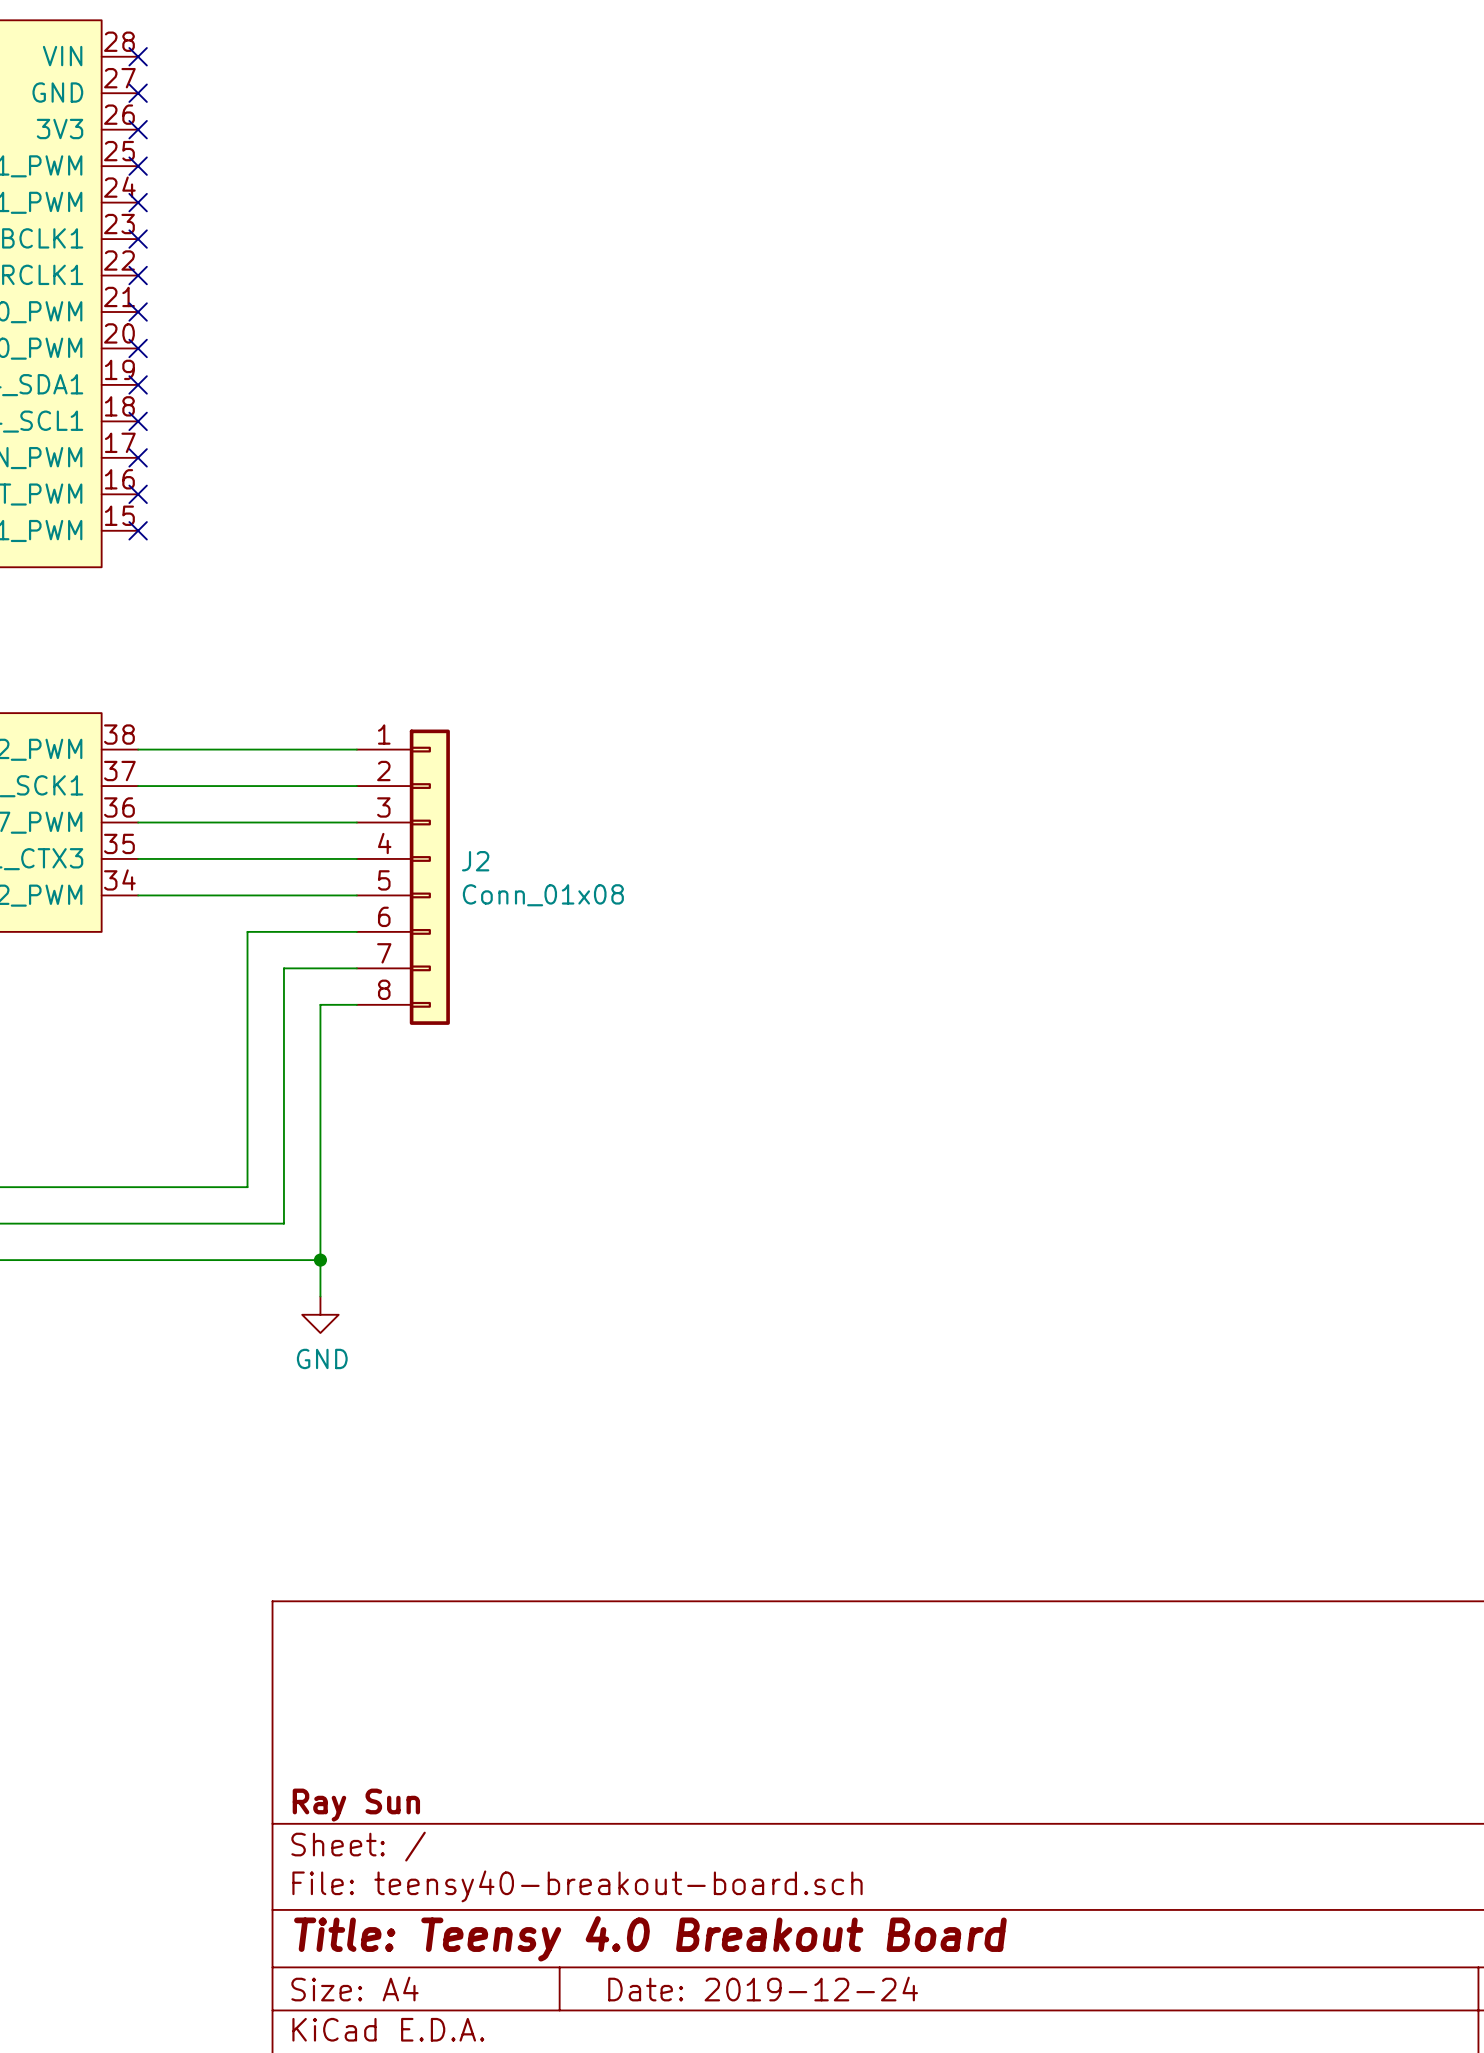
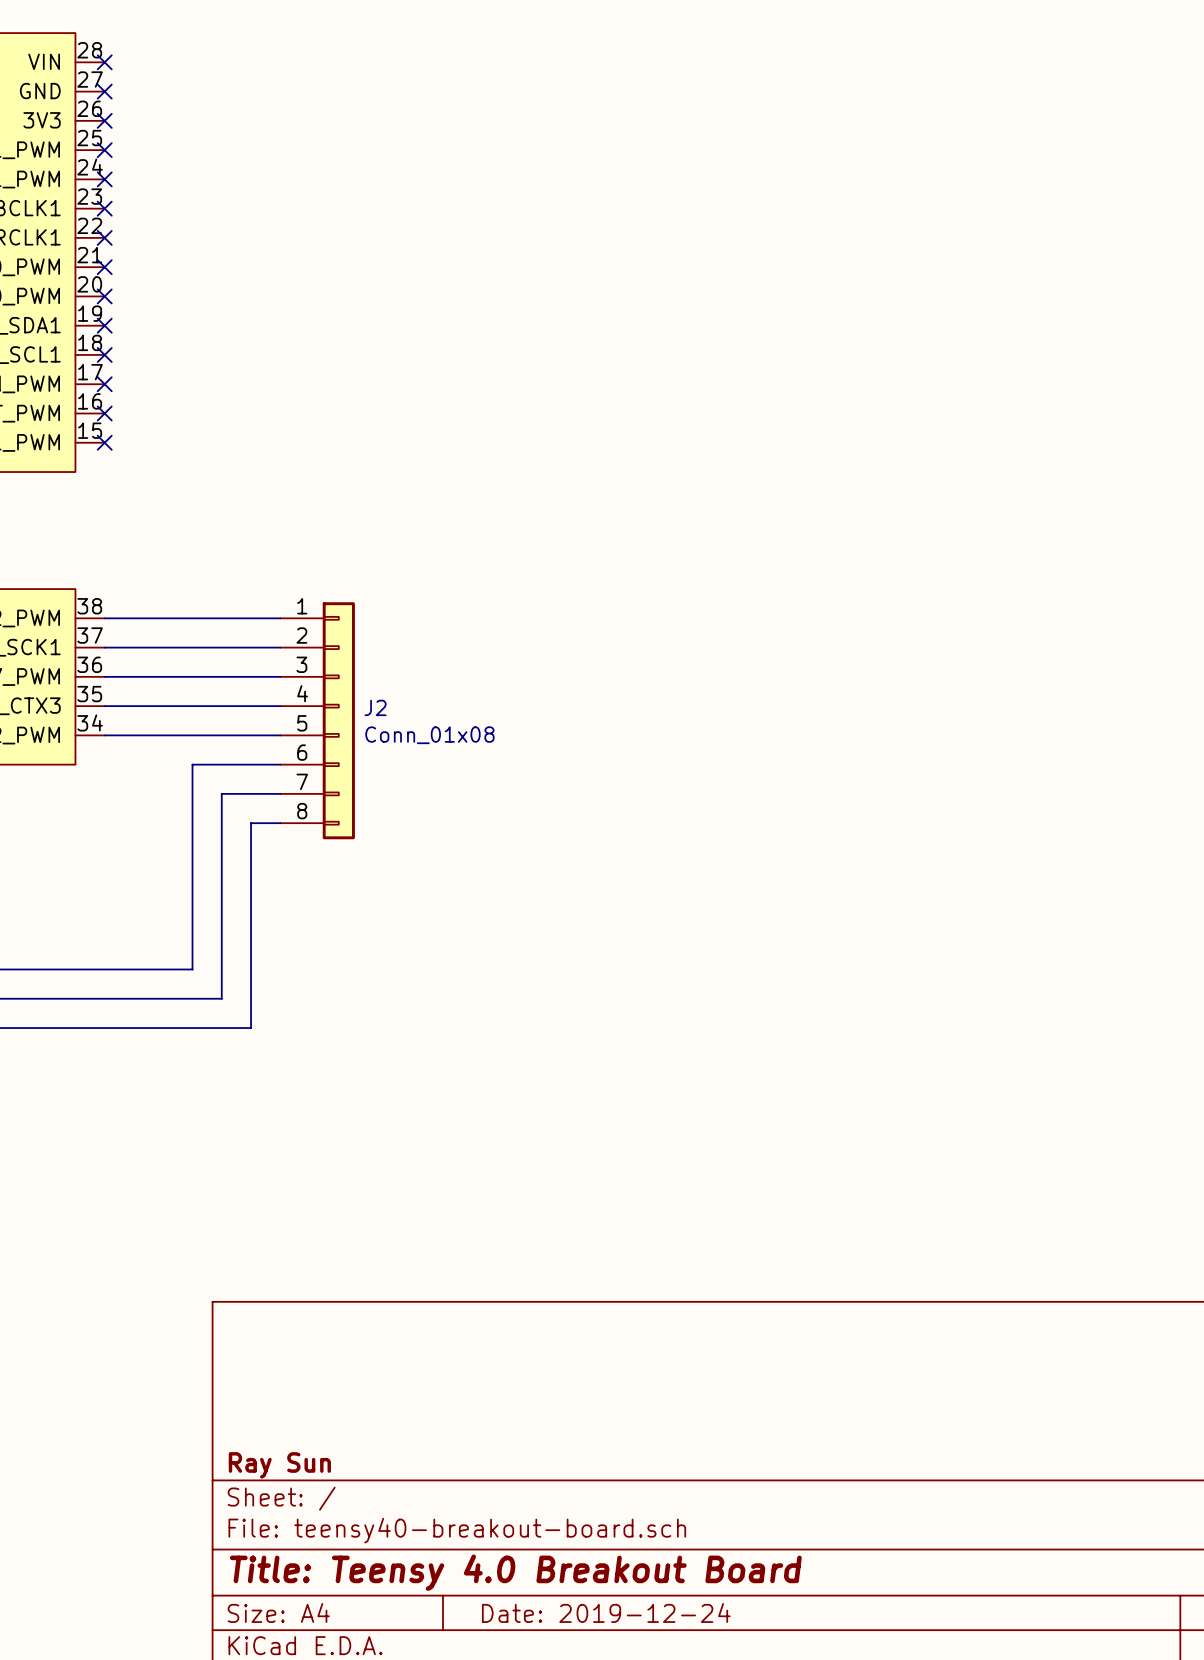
wire: (320, 1260) (320, 1296) -> none
junction: (320, 1260) -> none
power symbol: GND (320, 1314) -> none

